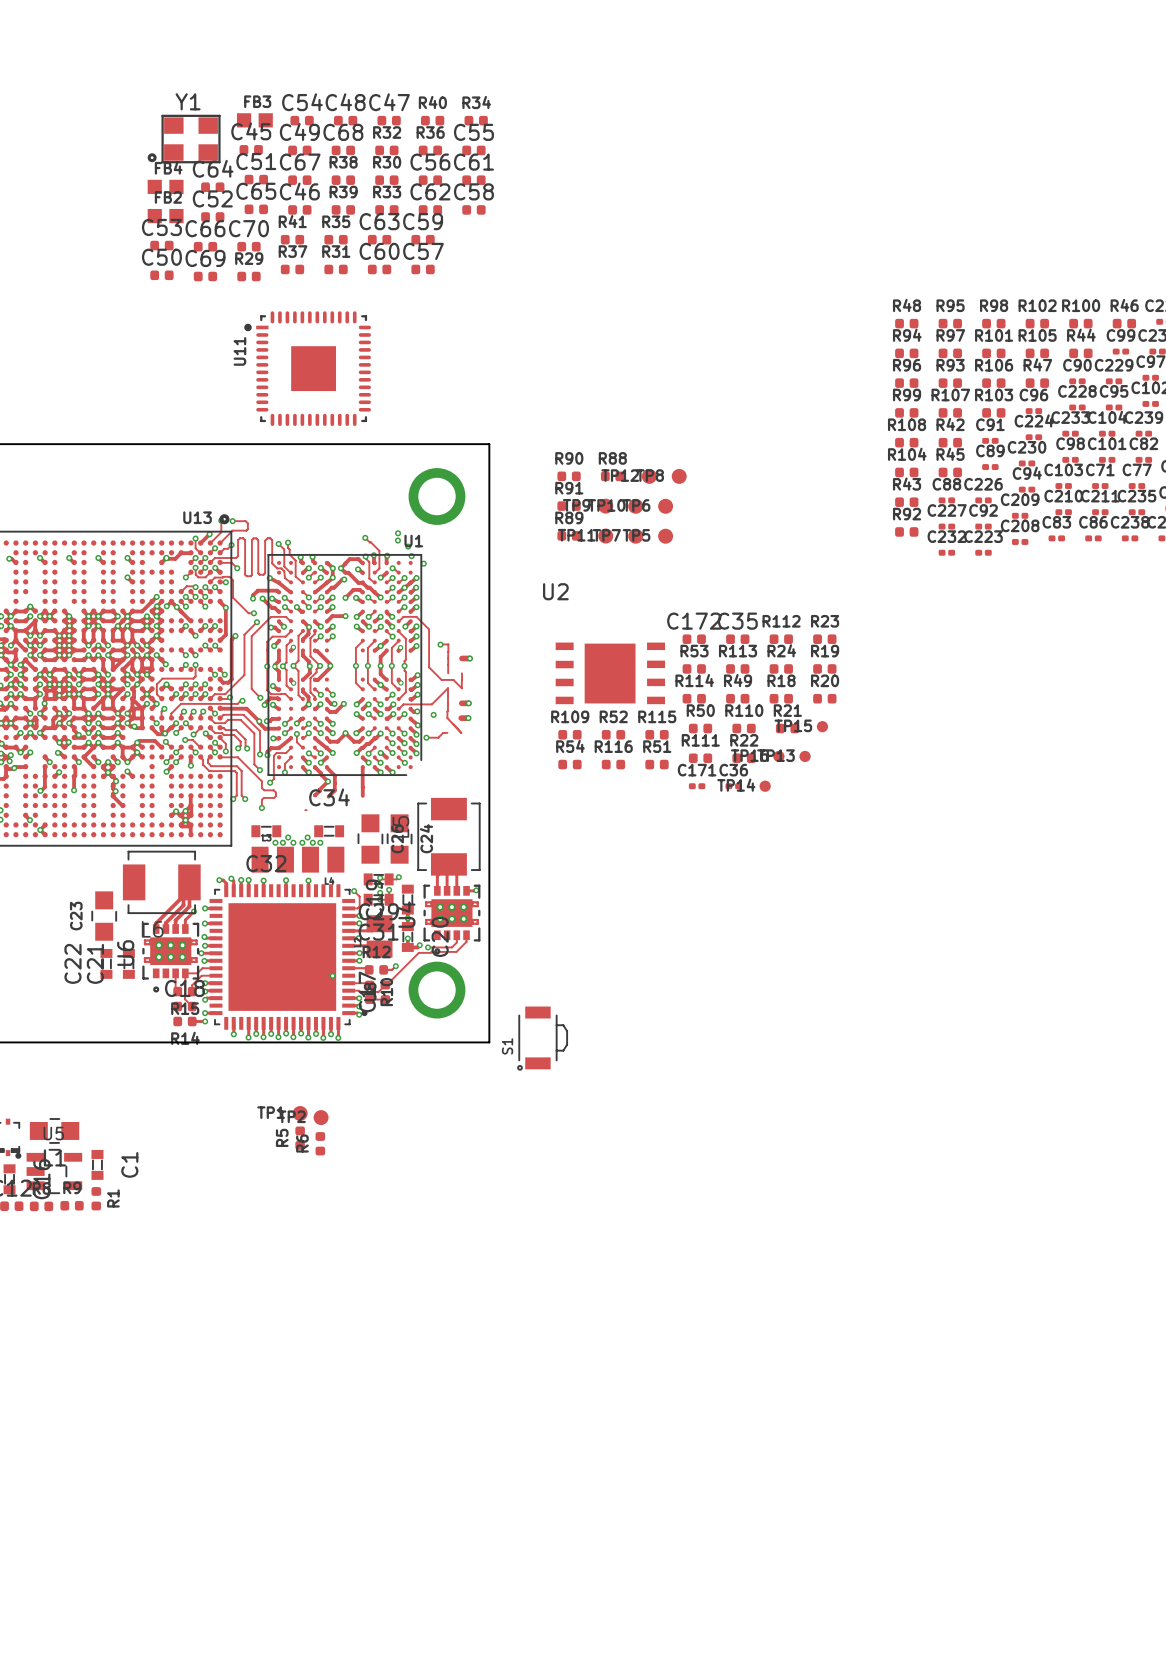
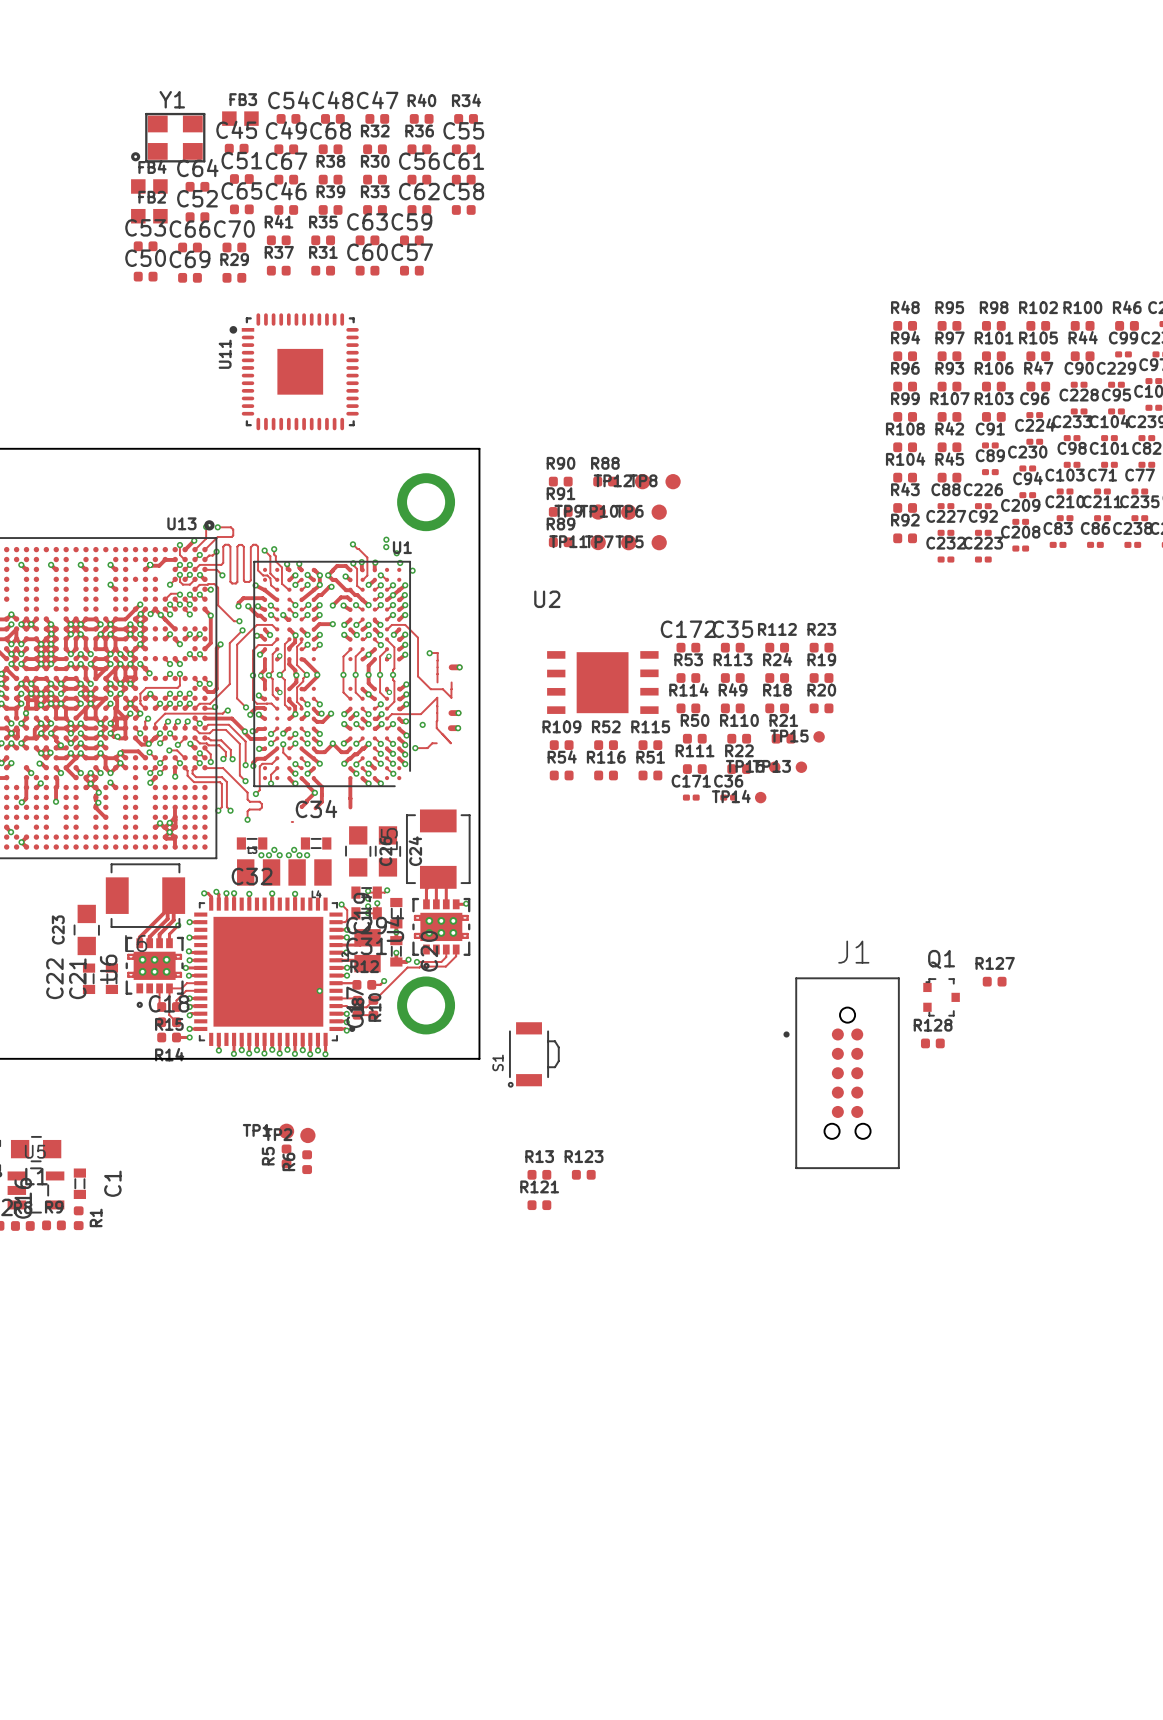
R127: none -> (994, 981)
Q1: none -> (941, 997)
R128: none -> (932, 1043)
J1: none -> (841, 1073)
R13: none -> (539, 1174)
R123: none -> (583, 1174)
R121: none -> (539, 1205)

